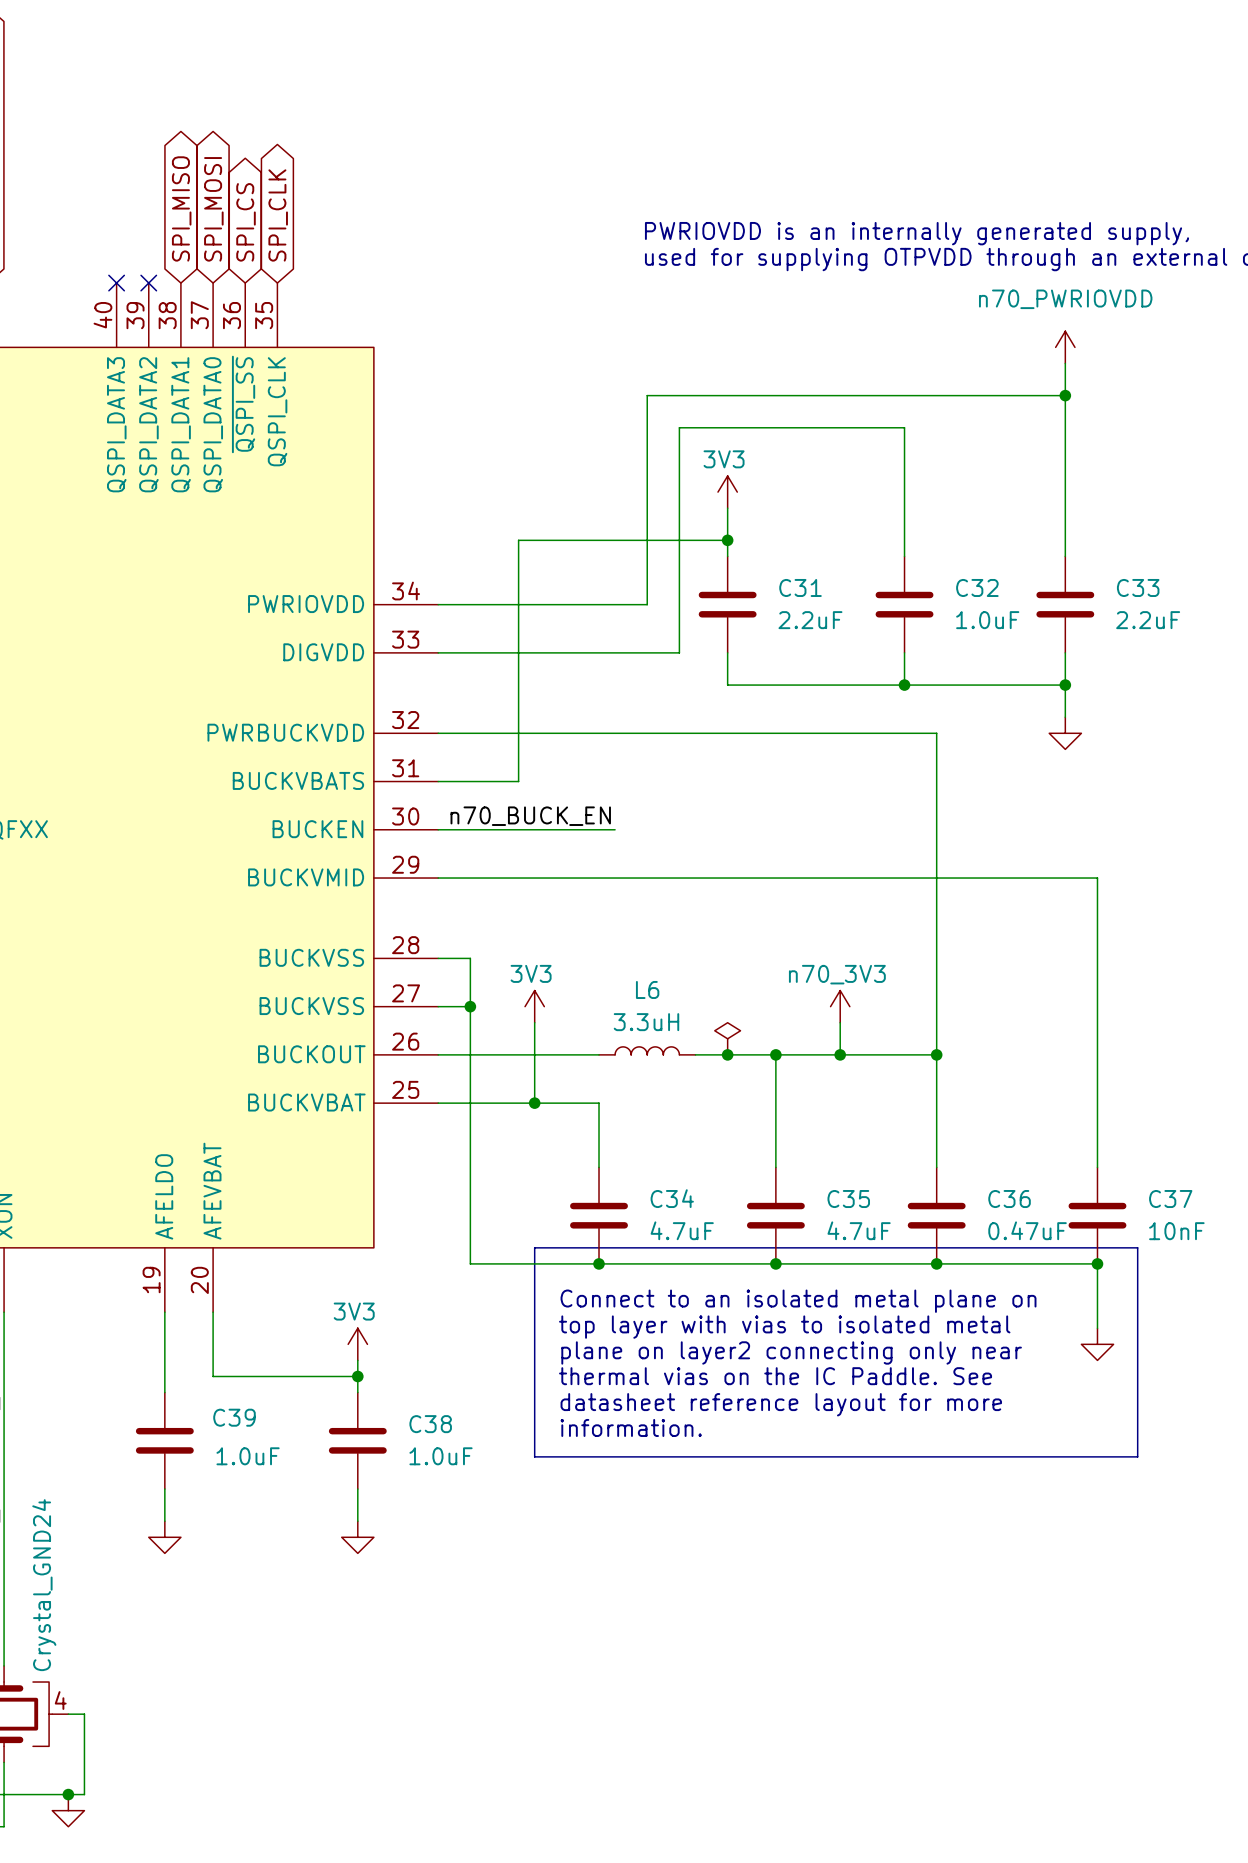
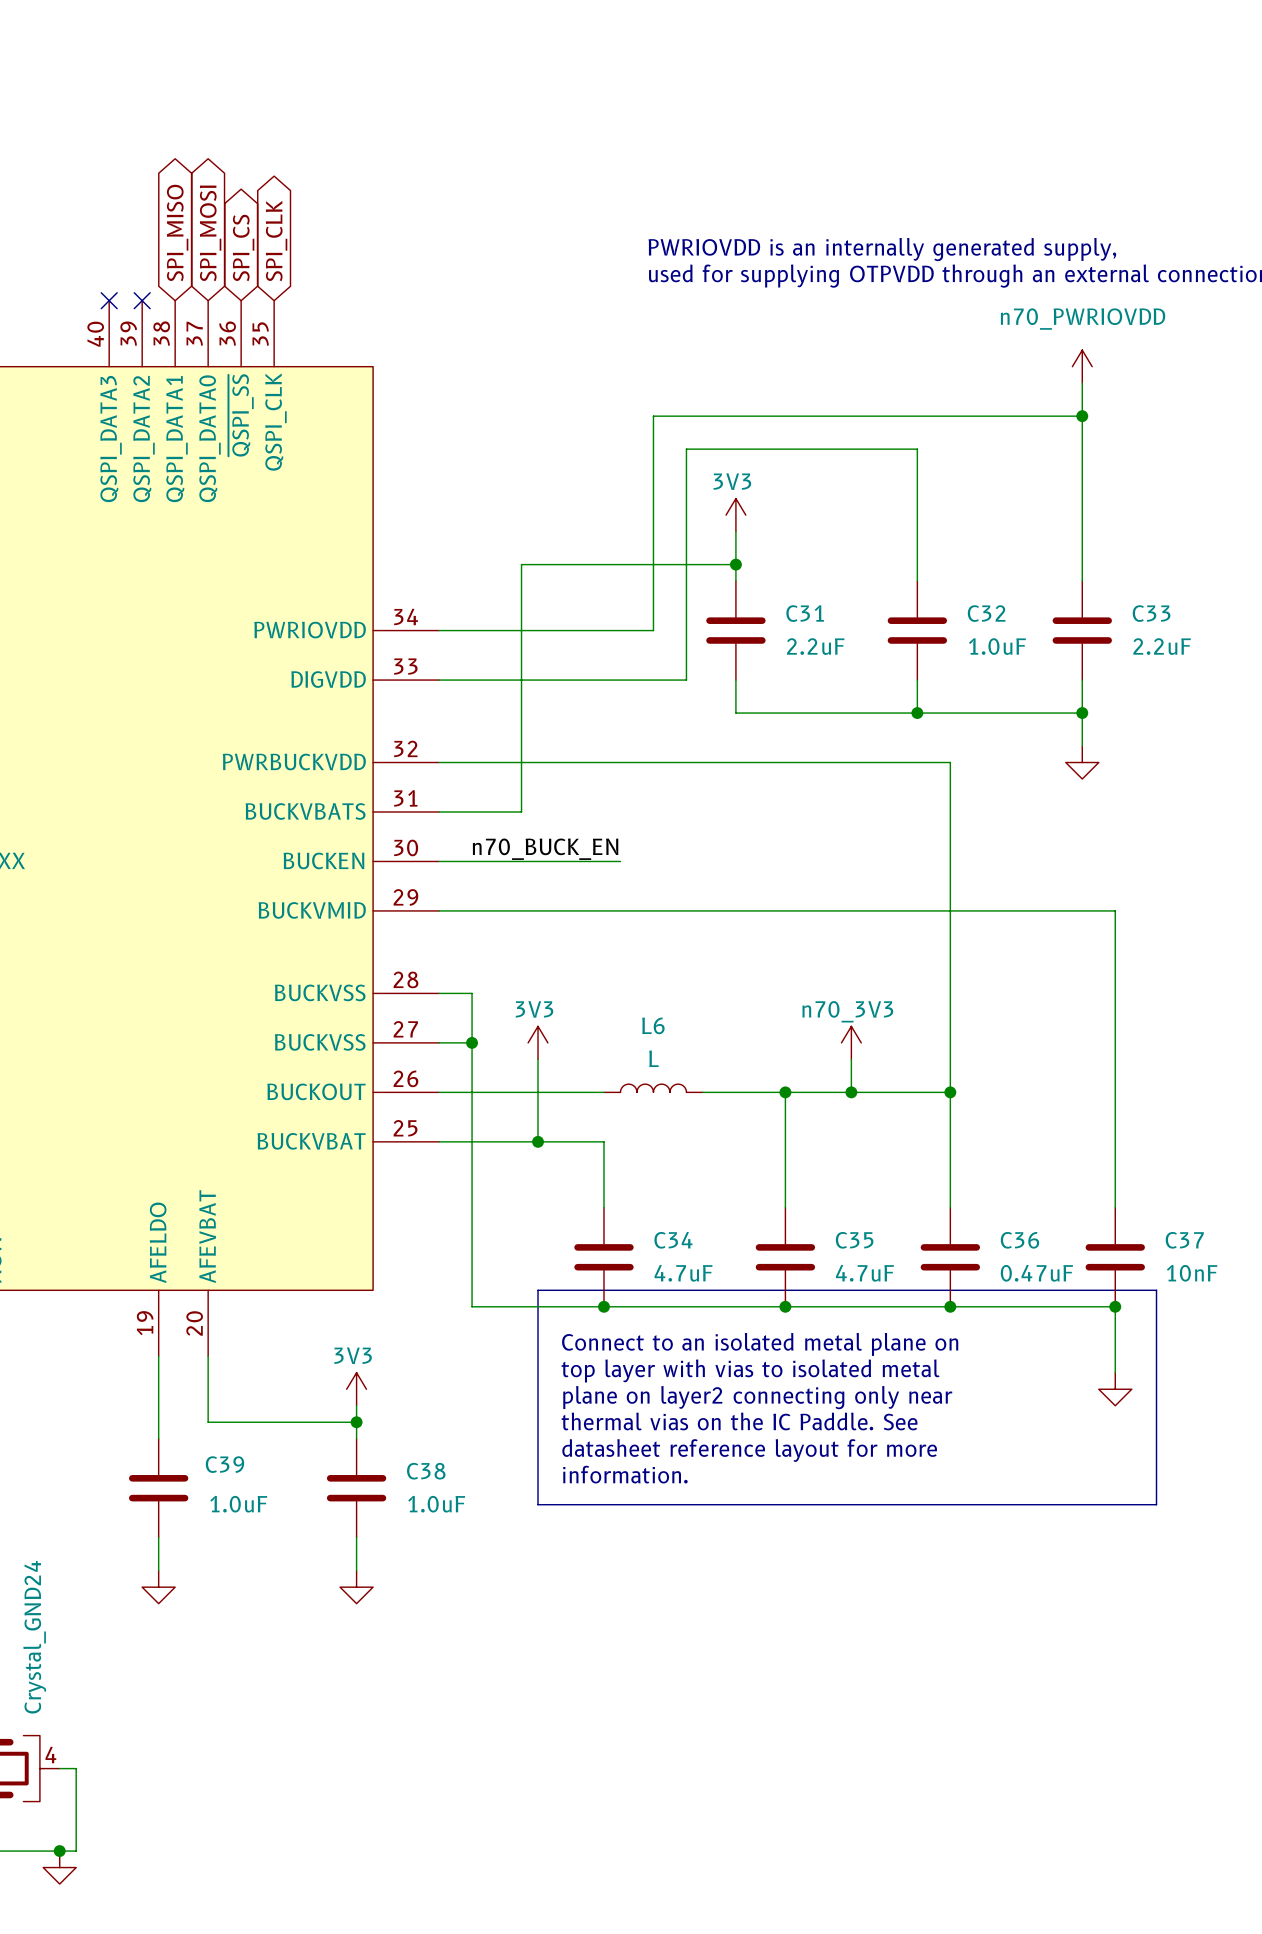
L6 value: 3.3uH (646, 1022) -> L (654, 1058)
power symbol: (727, 1038) -> none
junction: (727, 1054) -> none

